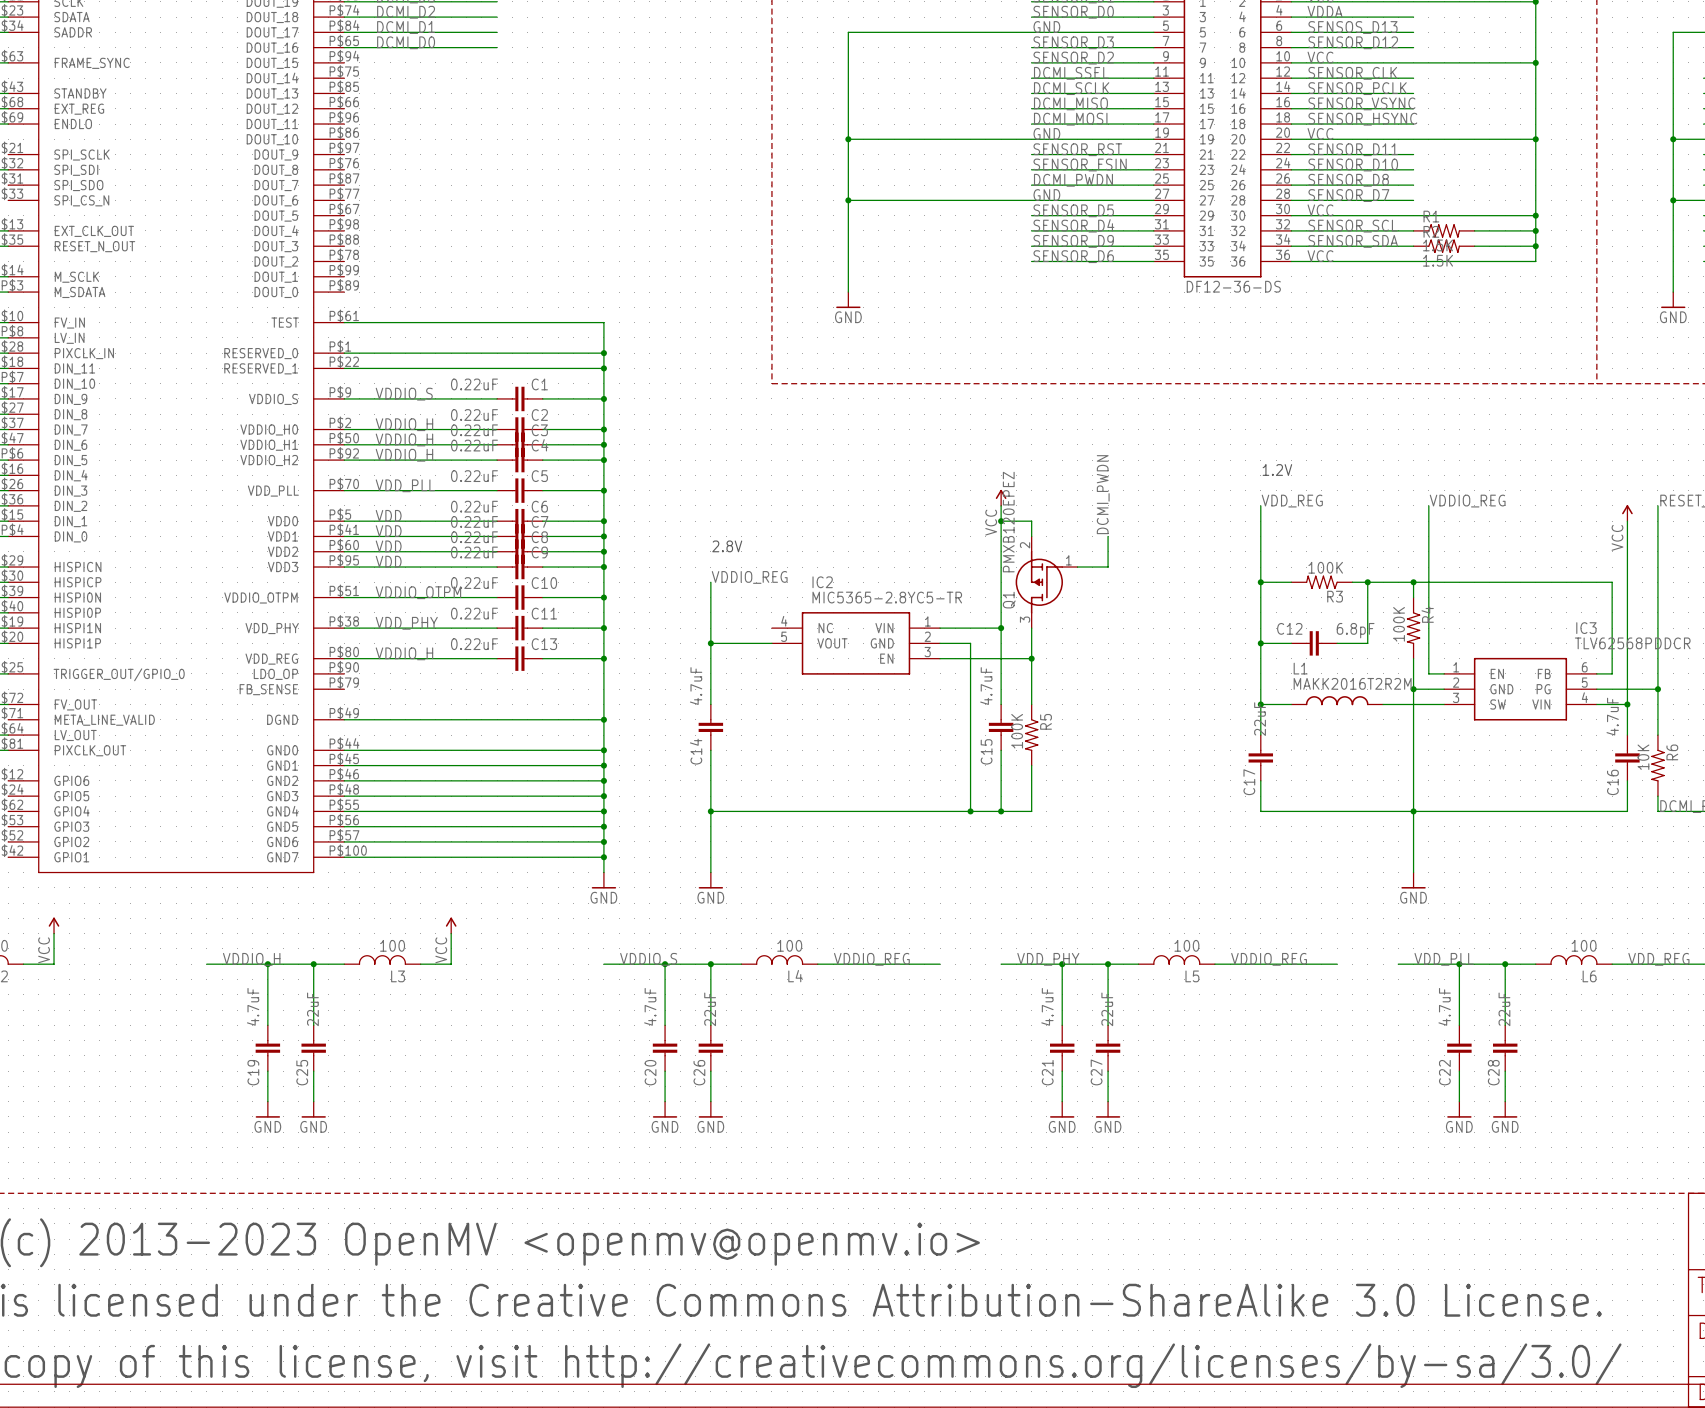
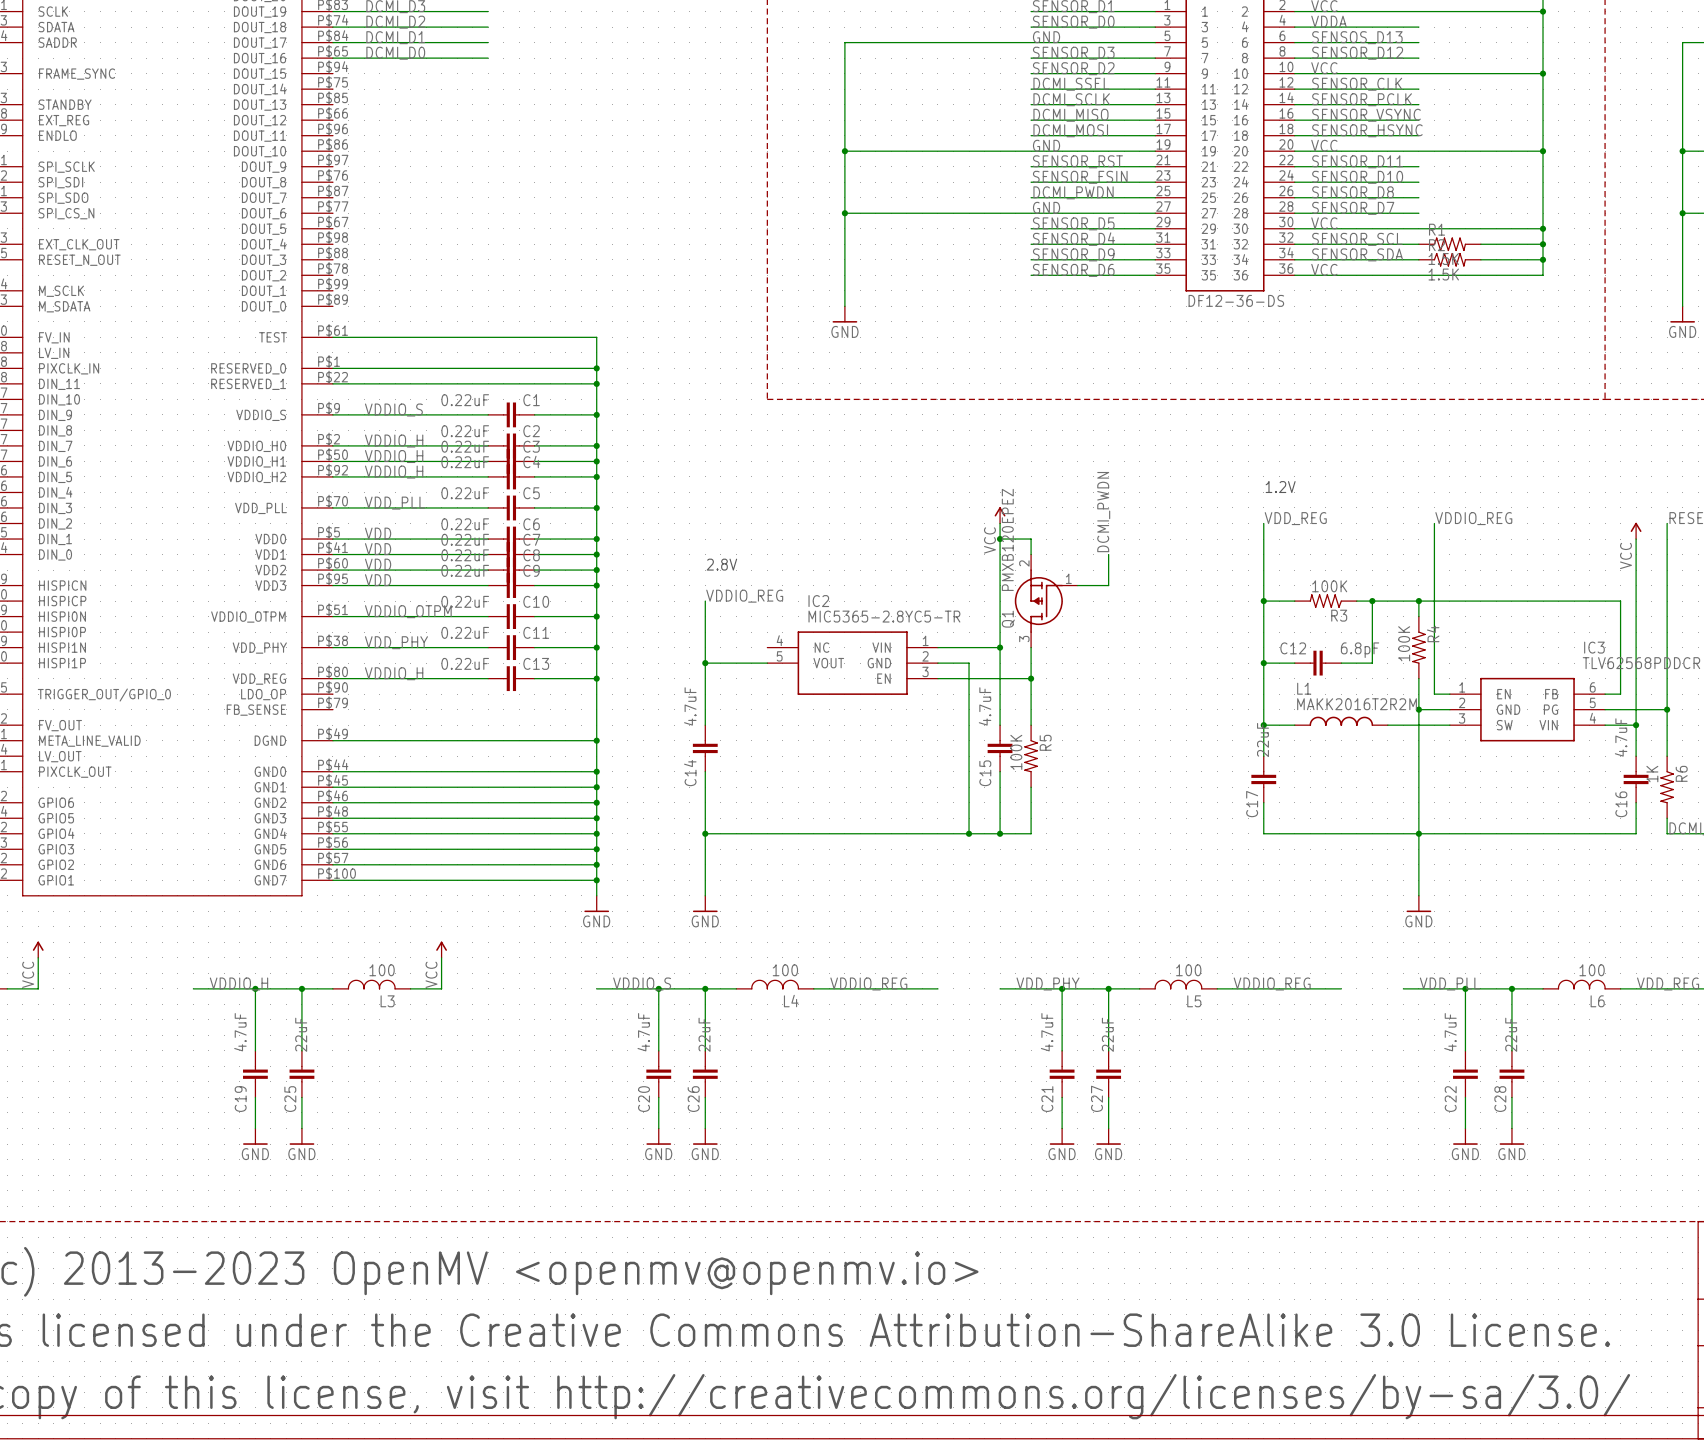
R6 value: 10K (1643, 757) -> 1K (1652, 774)

